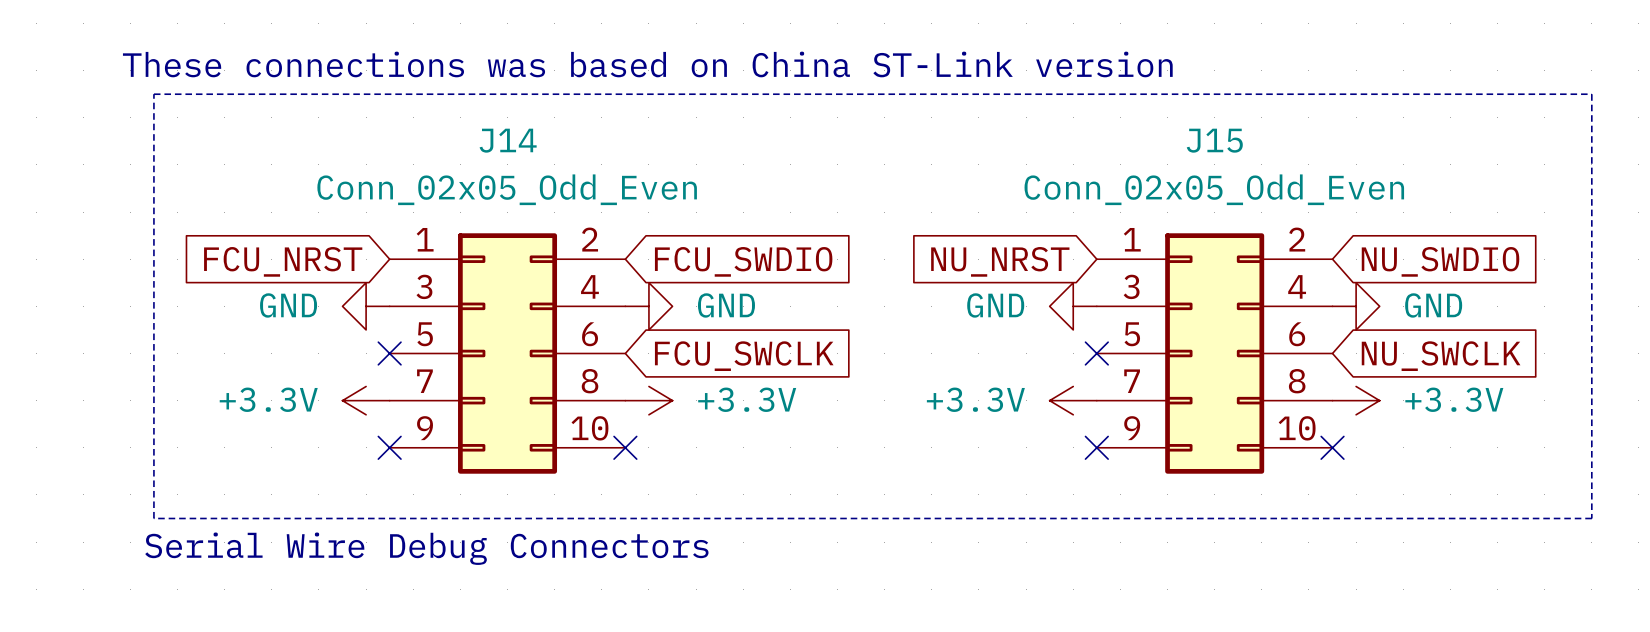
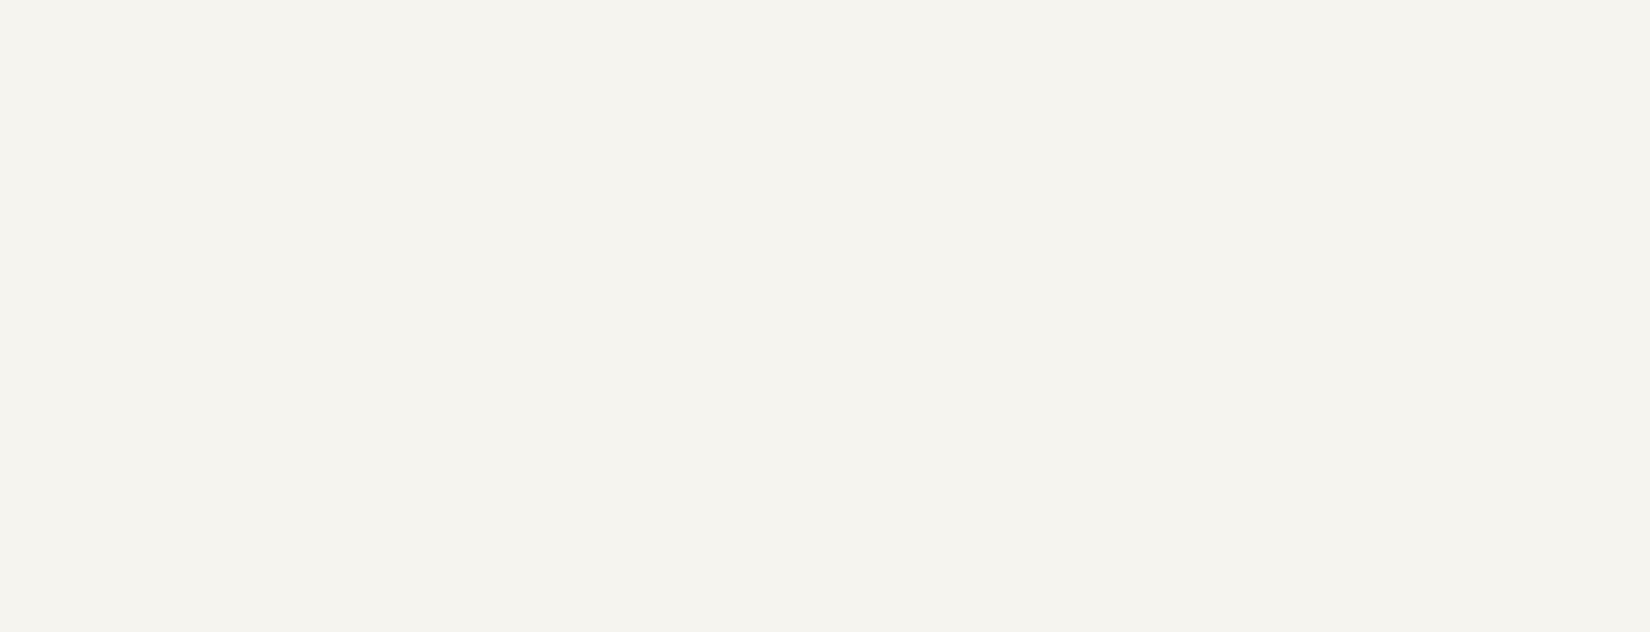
text: These connections was based on China ST-Link version (647, 64) -> none
line: (153, 94) (1591, 94) (1591, 518) (153, 518) (153, 94) -> none
global label: FCU_NRST (283, 261) -> none
global label: FCU_SWDIO (743, 261) -> none
global label: NU_NRST (1000, 261) -> none
global label: NU_SWDIO (1440, 261) -> none
power symbol: GND (366, 306) -> none
power symbol: GND (648, 306) -> none
power symbol: GND (1073, 306) -> none
power symbol: GND (1356, 306) -> none
no-connect mark: (389, 353) -> none
J14: Conn_02x05_Odd_Even (507, 353) -> none
no-connect mark: (1096, 353) -> none
J15: Conn_02x05_Odd_Even (1214, 353) -> none
global label: FCU_SWCLK (744, 356) -> none
global label: NU_SWCLK (1441, 356) -> none
power symbol: +3.3V (366, 400) -> none
power symbol: +3.3V (648, 400) -> none
power symbol: +3.3V (1073, 400) -> none
power symbol: +3.3V (1356, 400) -> none
no-connect mark: (389, 447) -> none
no-connect mark: (625, 447) -> none
no-connect mark: (1096, 447) -> none
no-connect mark: (1332, 447) -> none
text: Serial Wire Debug Connectors (426, 548) -> none

